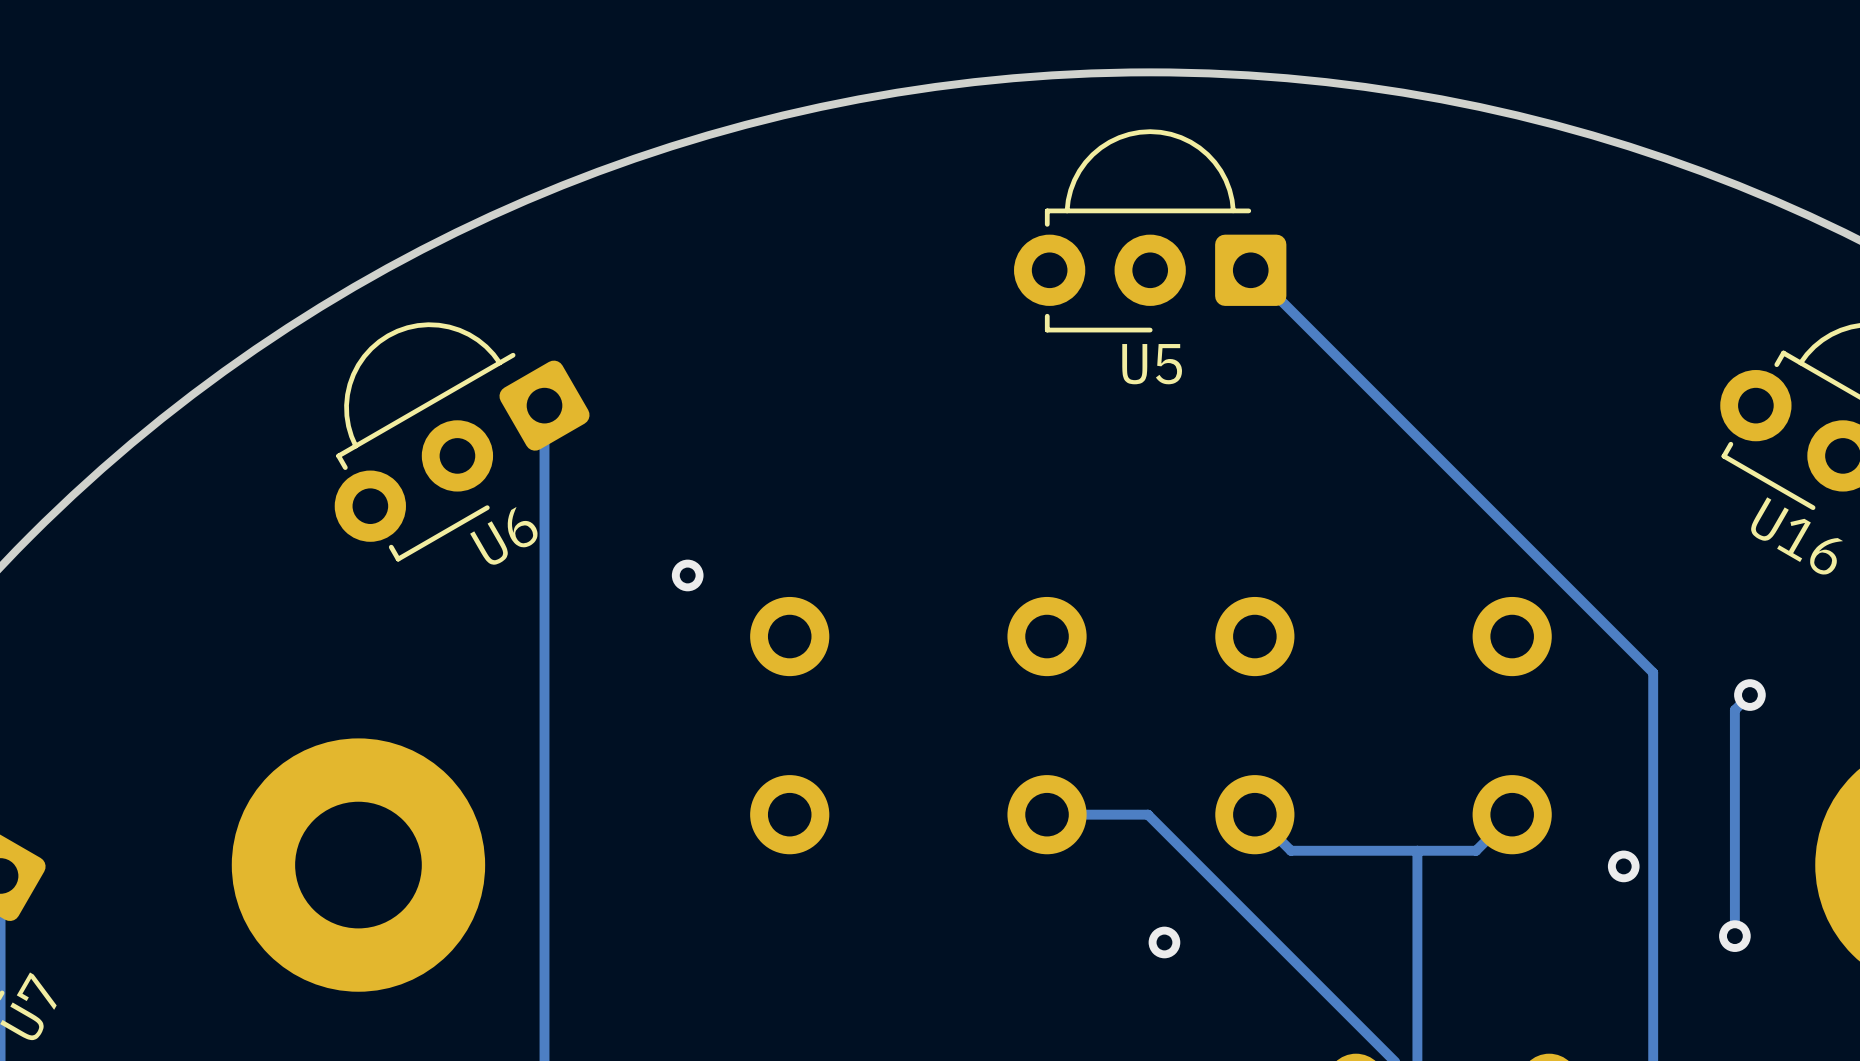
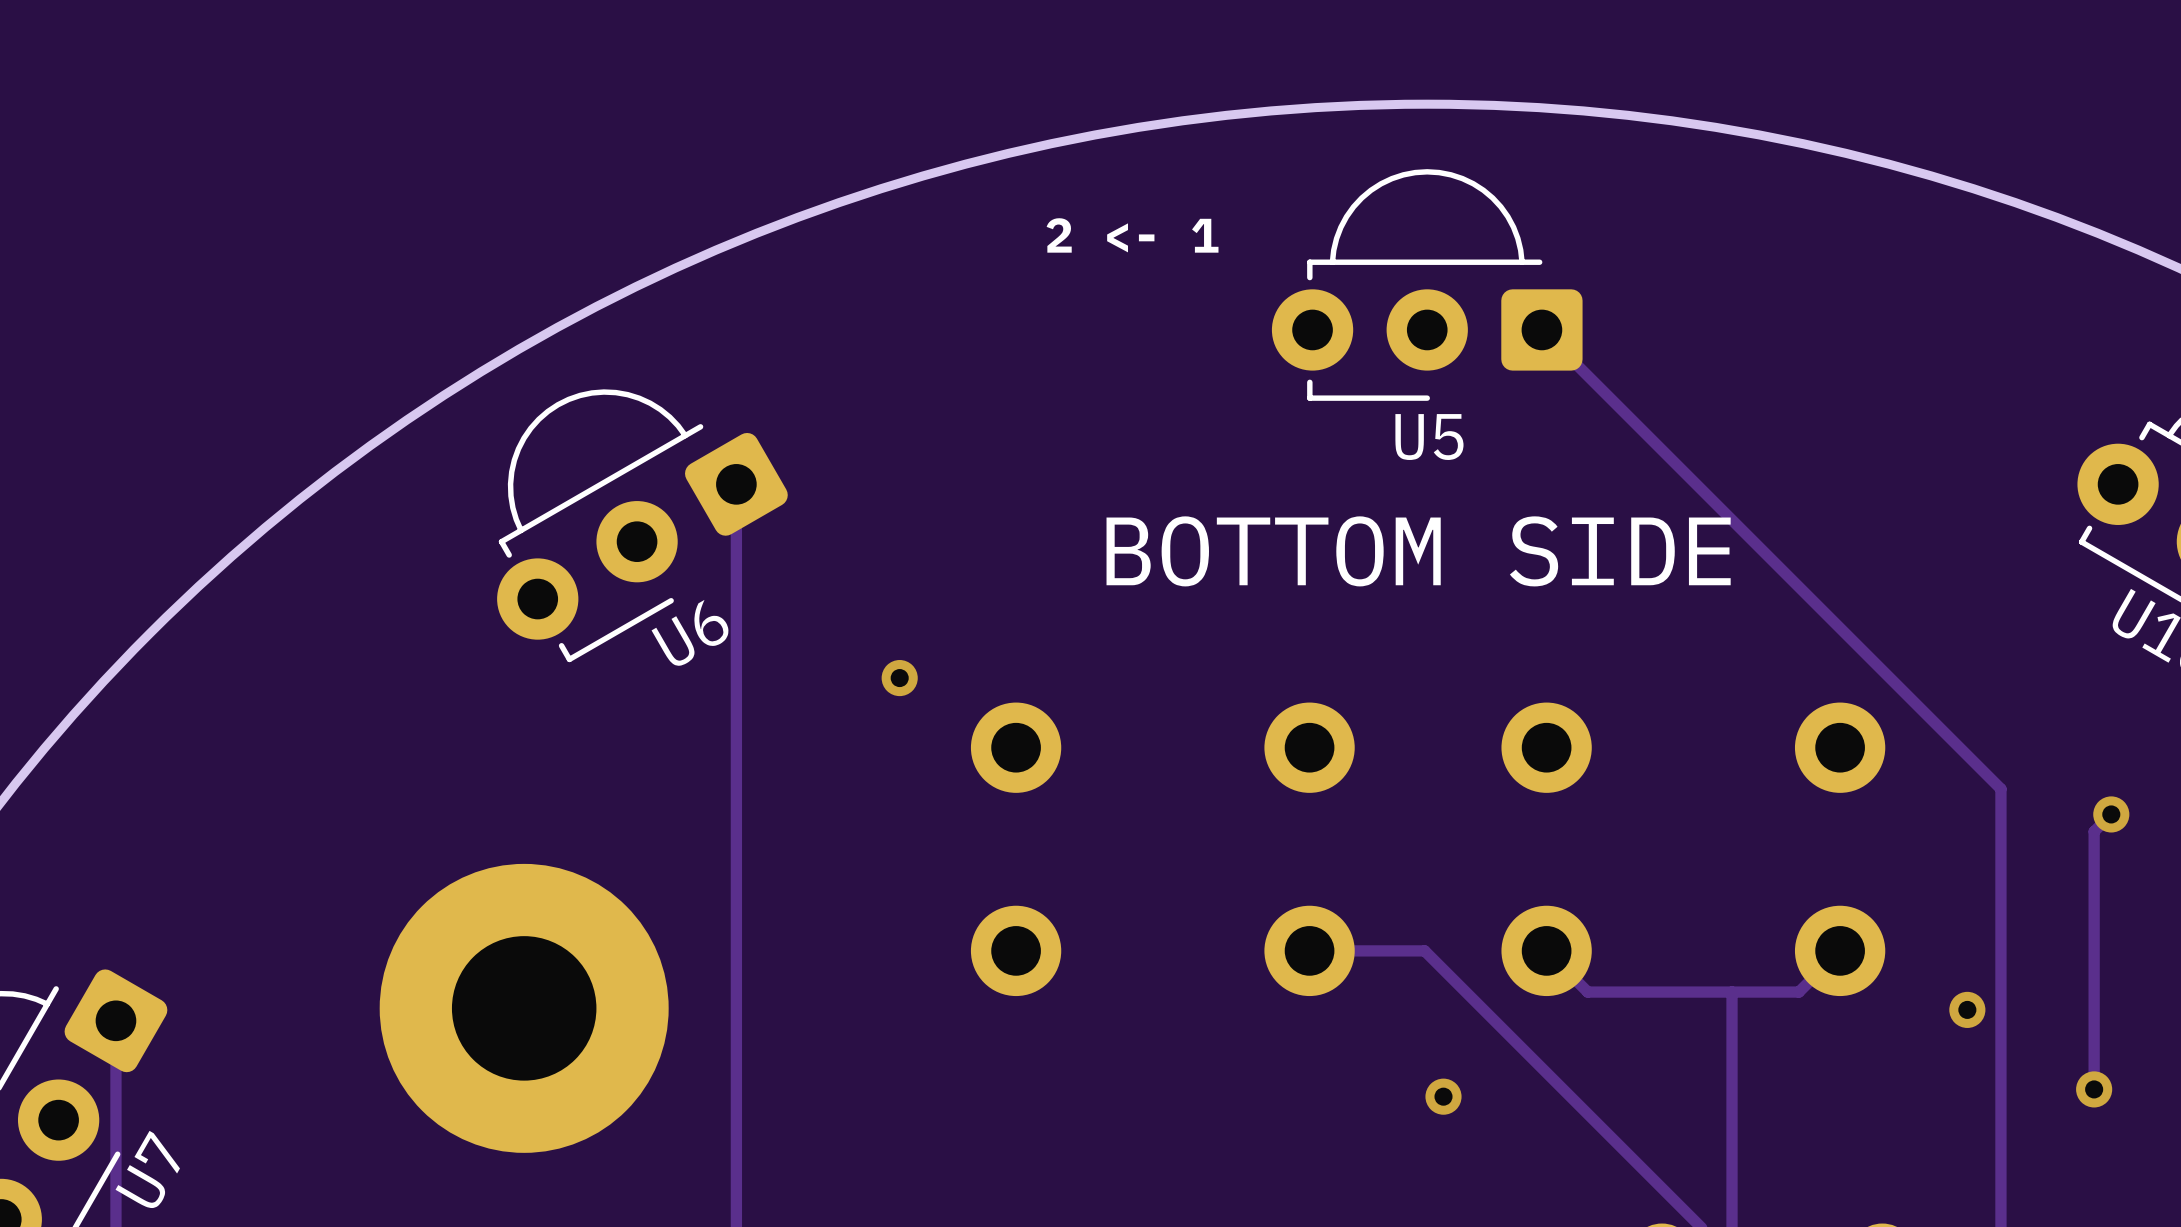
text: none -> 2 <- 1 (1132, 235)
text: none -> BOTTOM SIDE (1418, 551)

